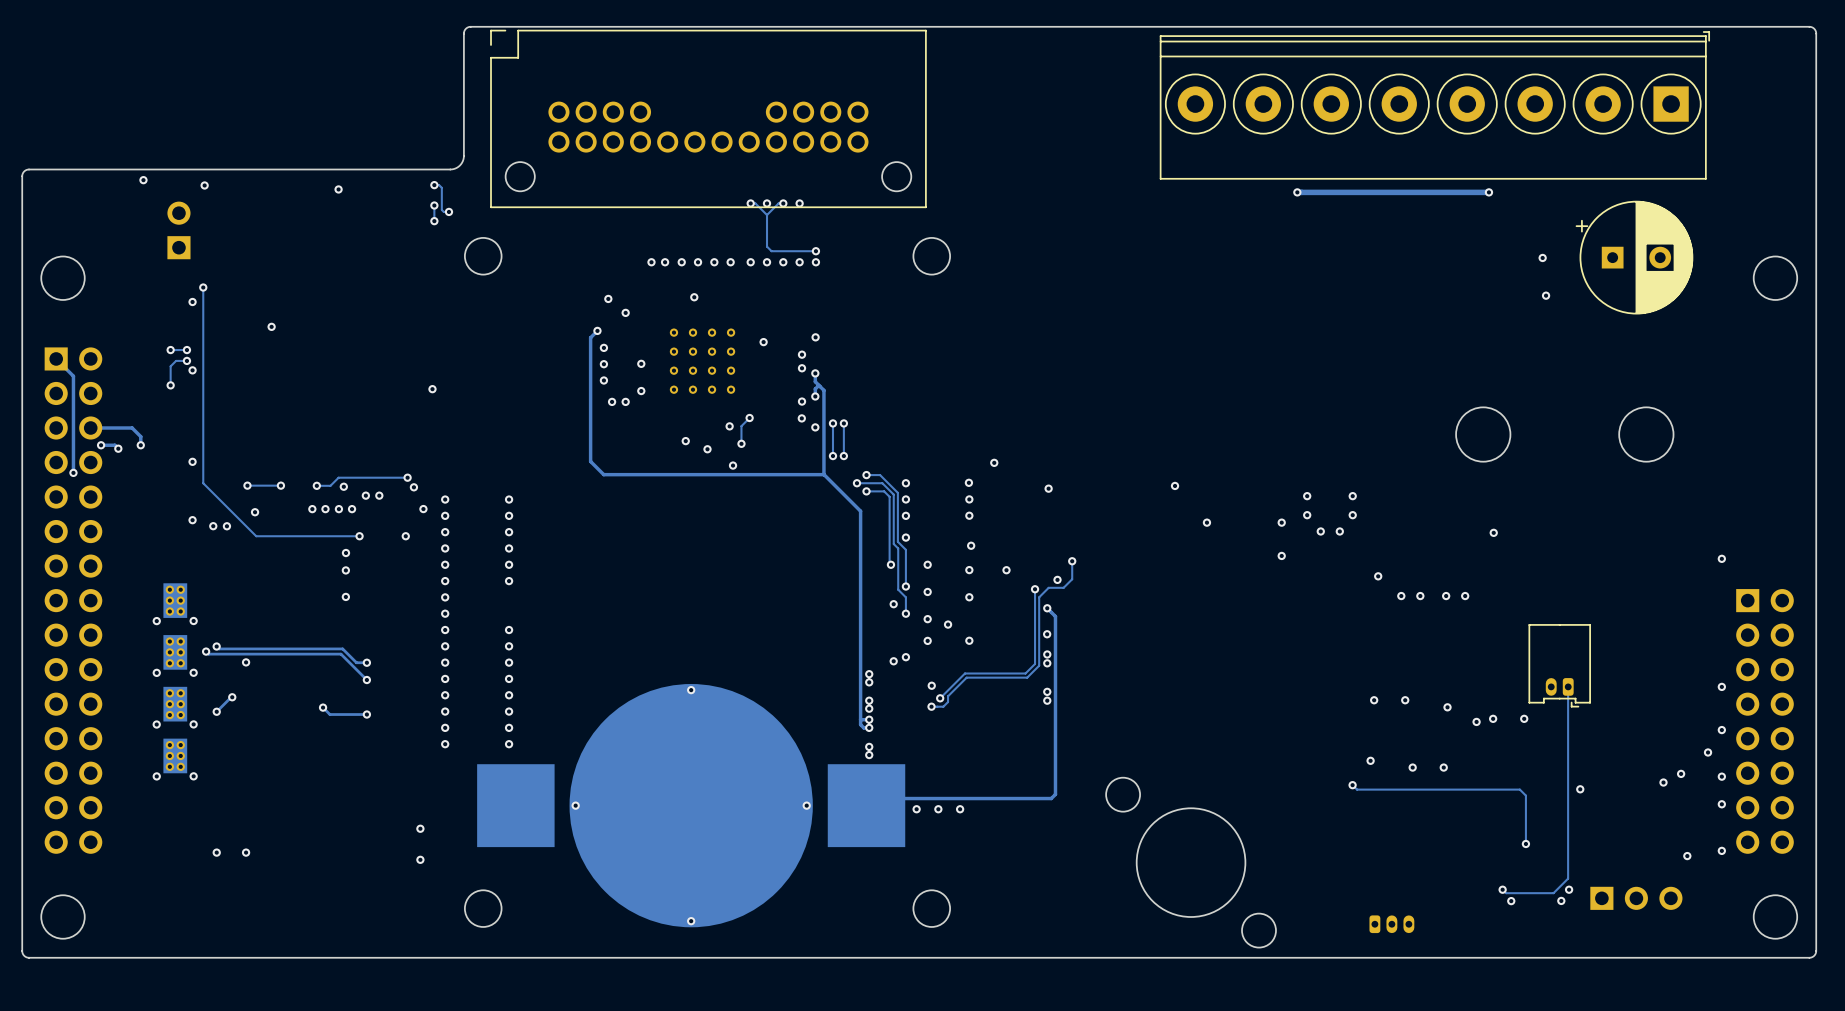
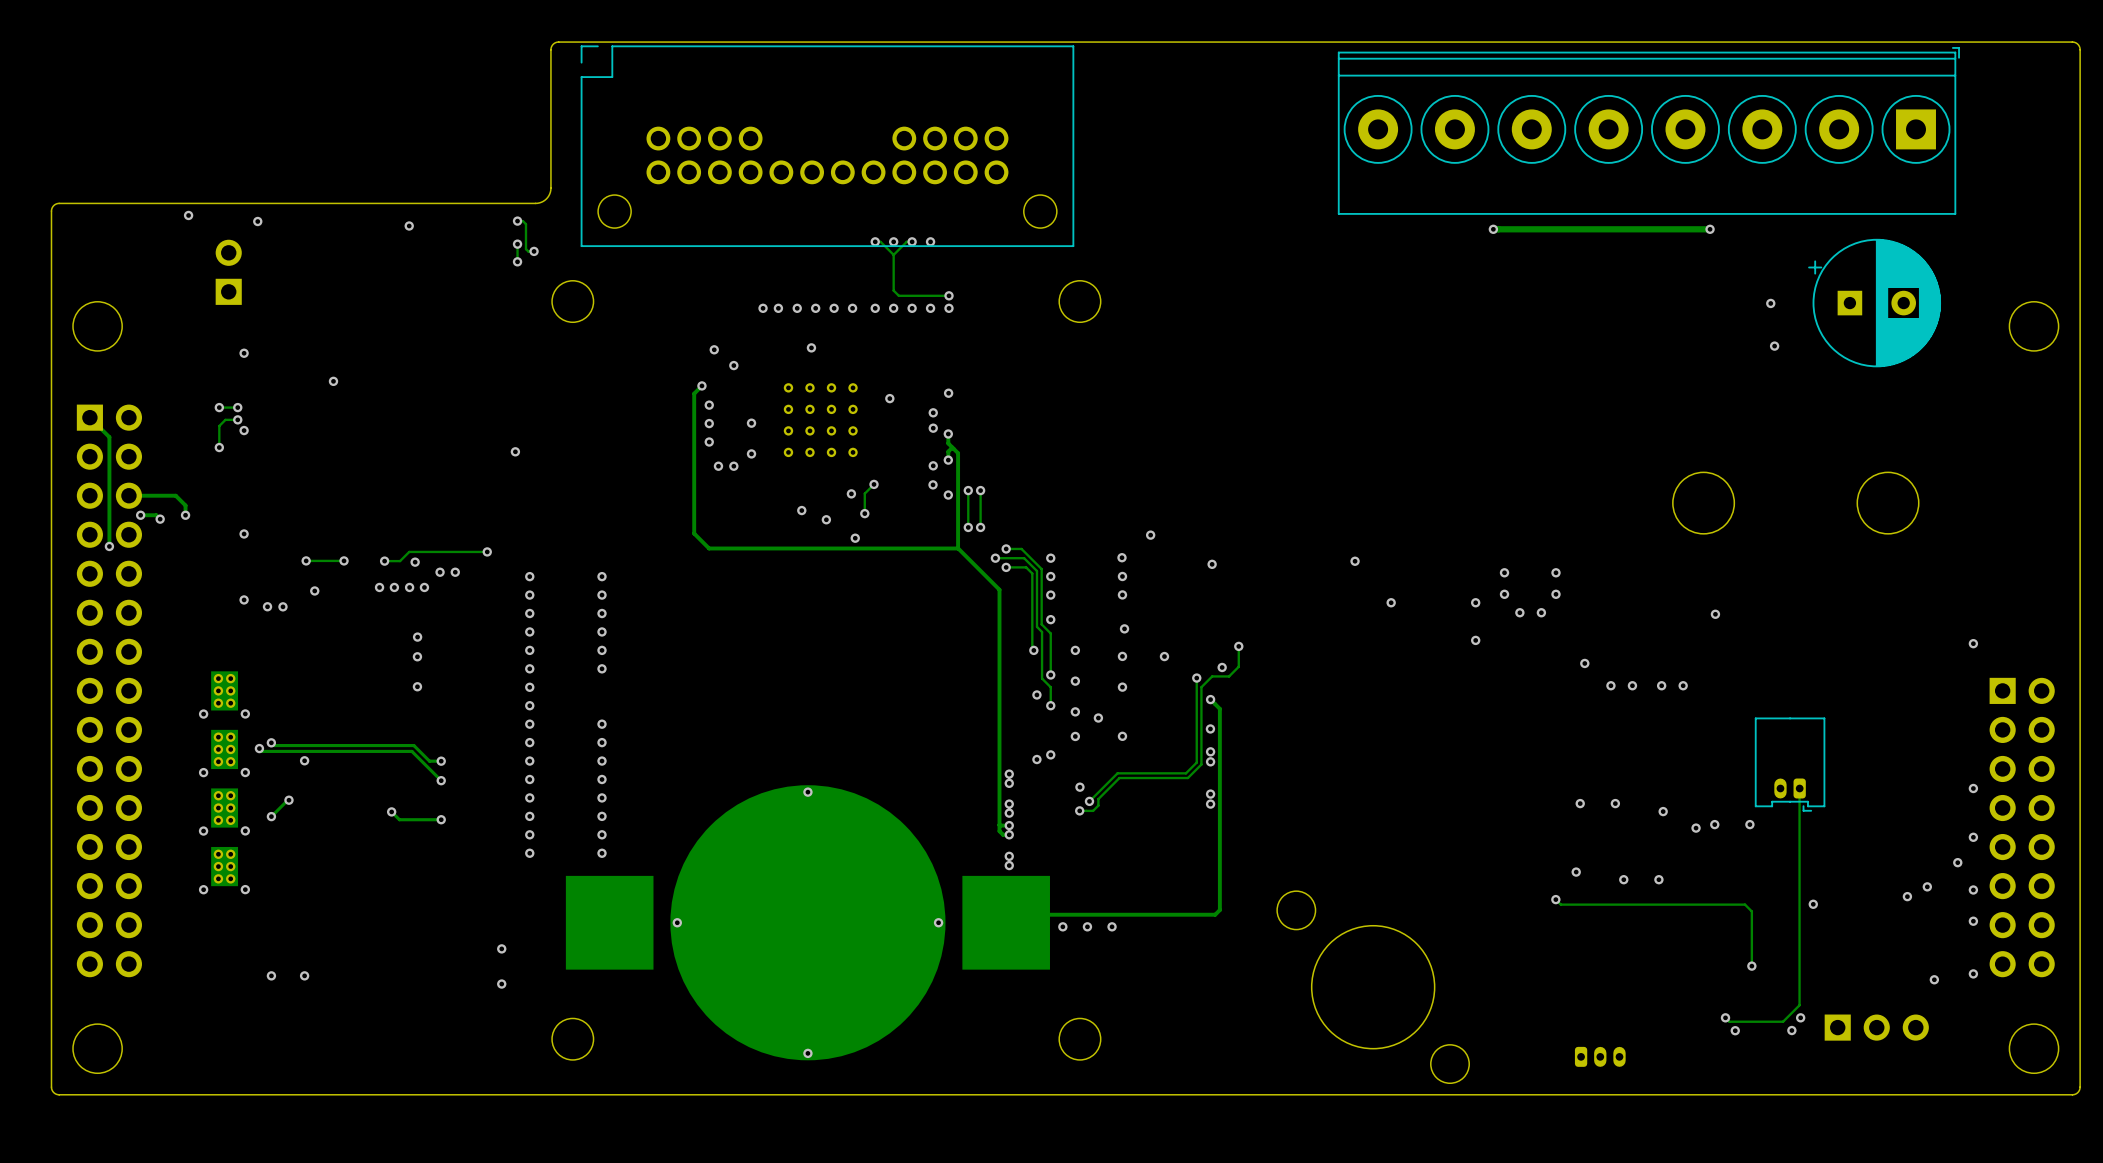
track: (203, 287) (203, 483) (256, 536) (359, 536) -> none
via: (203, 287) -> none
via: (413, 487) -> none
via: (423, 509) -> none
via: (359, 536) -> none
via: (405, 536) -> none

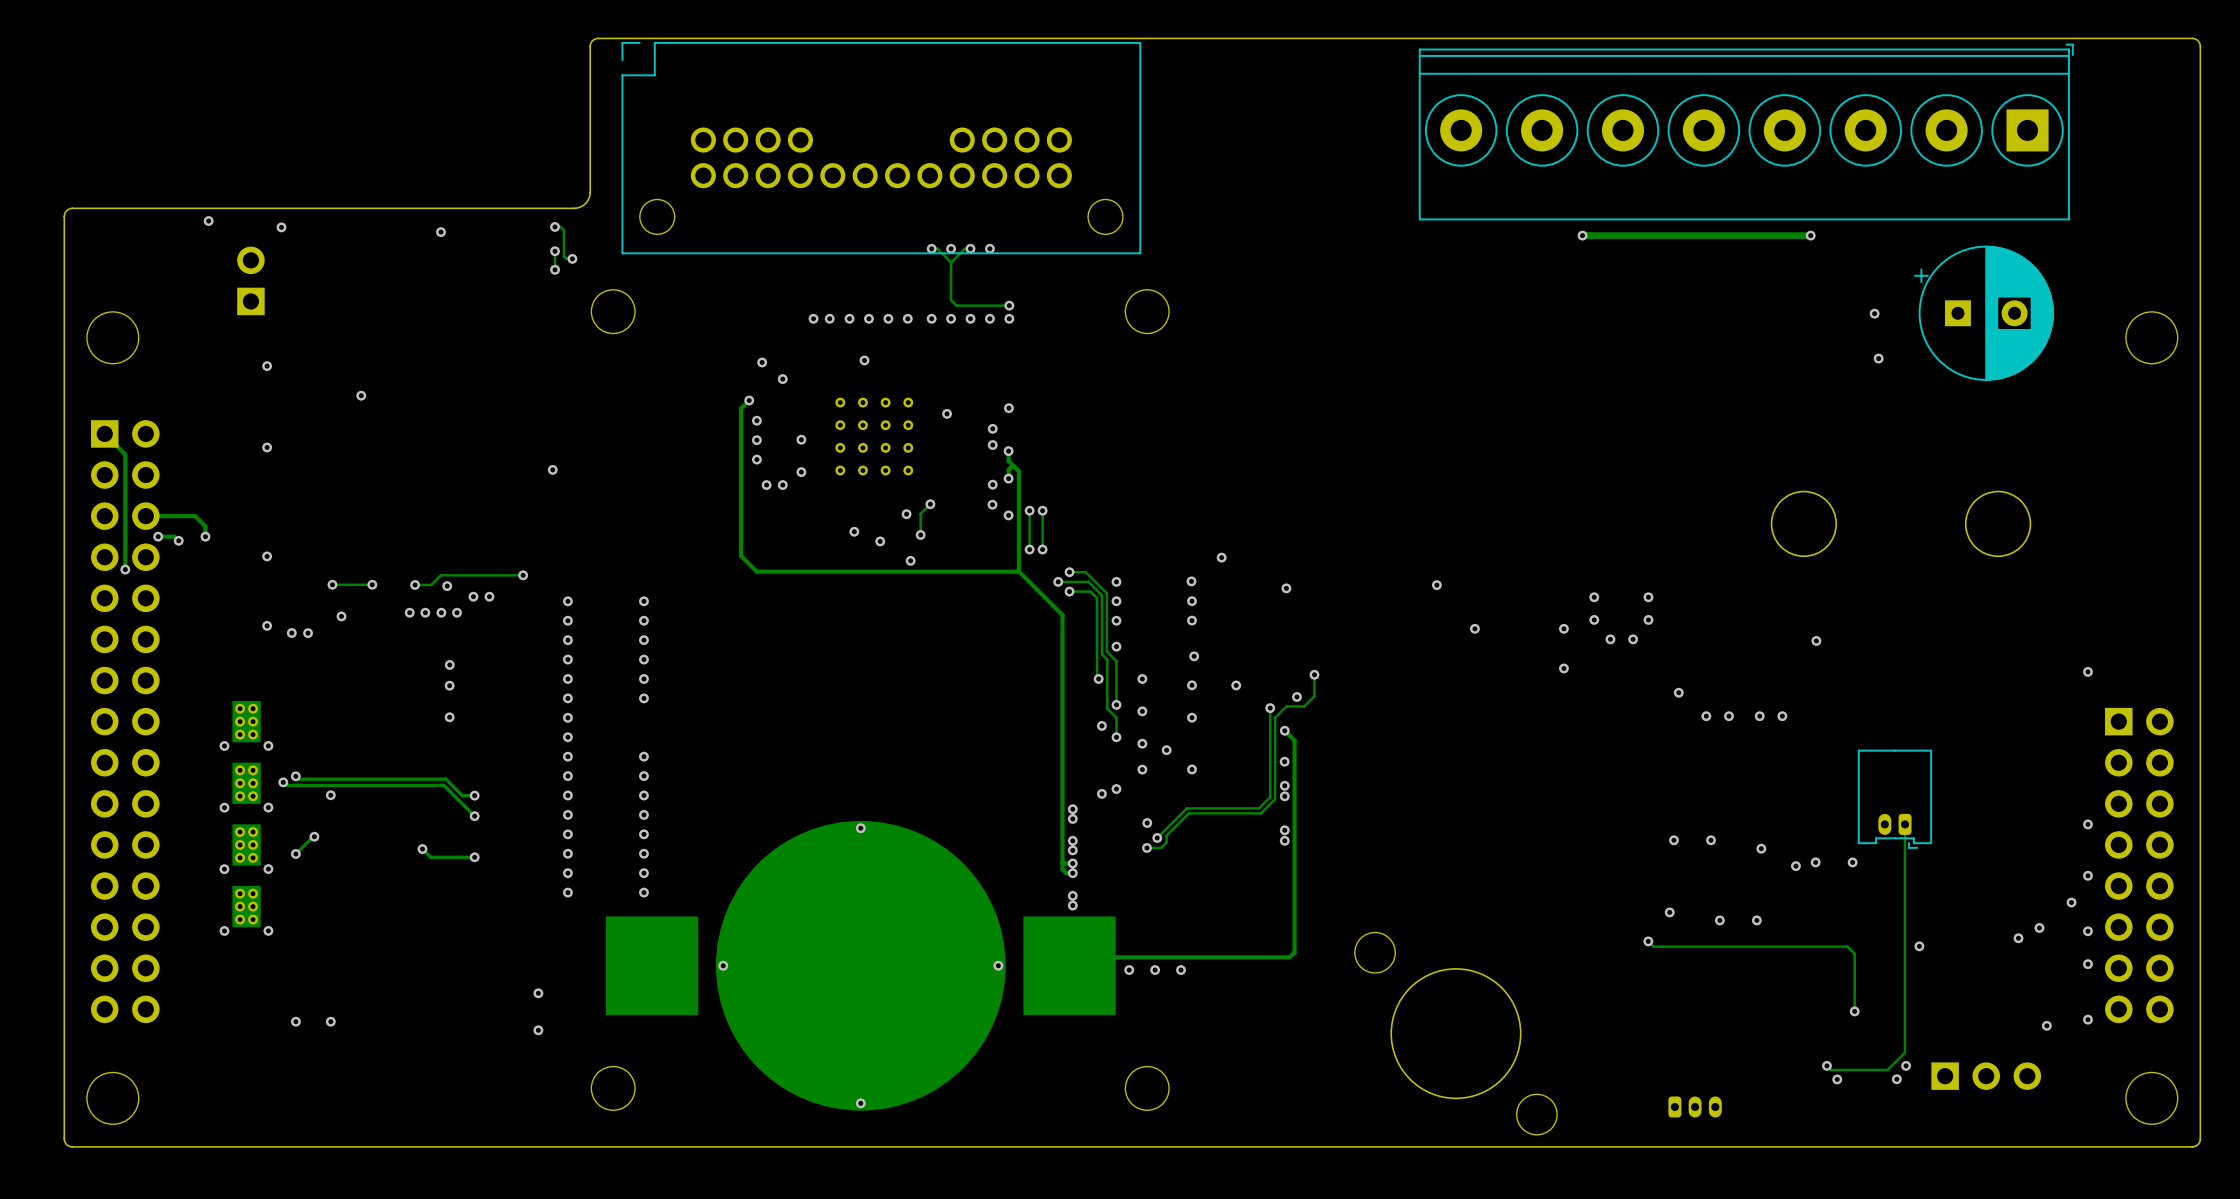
via: (219, 407) -> none
track: (237, 407) (219, 407) -> none
via: (237, 407) -> none
track: (237, 419) (225, 419) (219, 426) (219, 447) -> none
via: (237, 419) -> none
via: (219, 447) -> none

